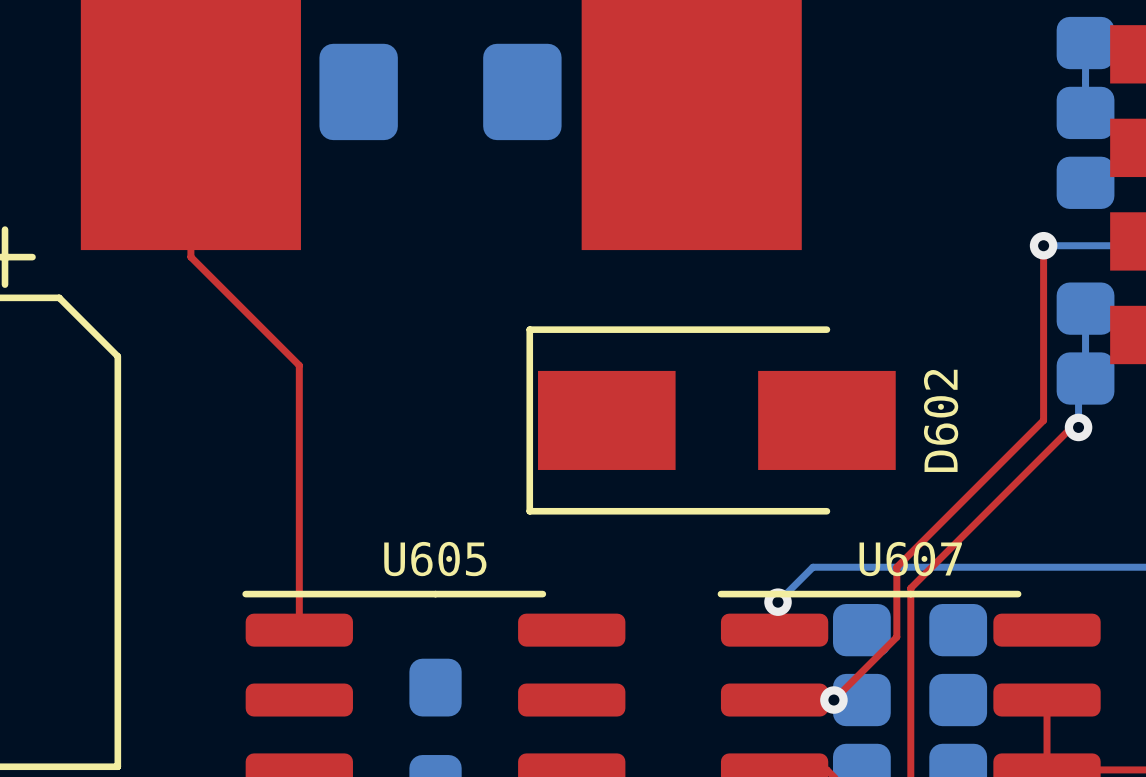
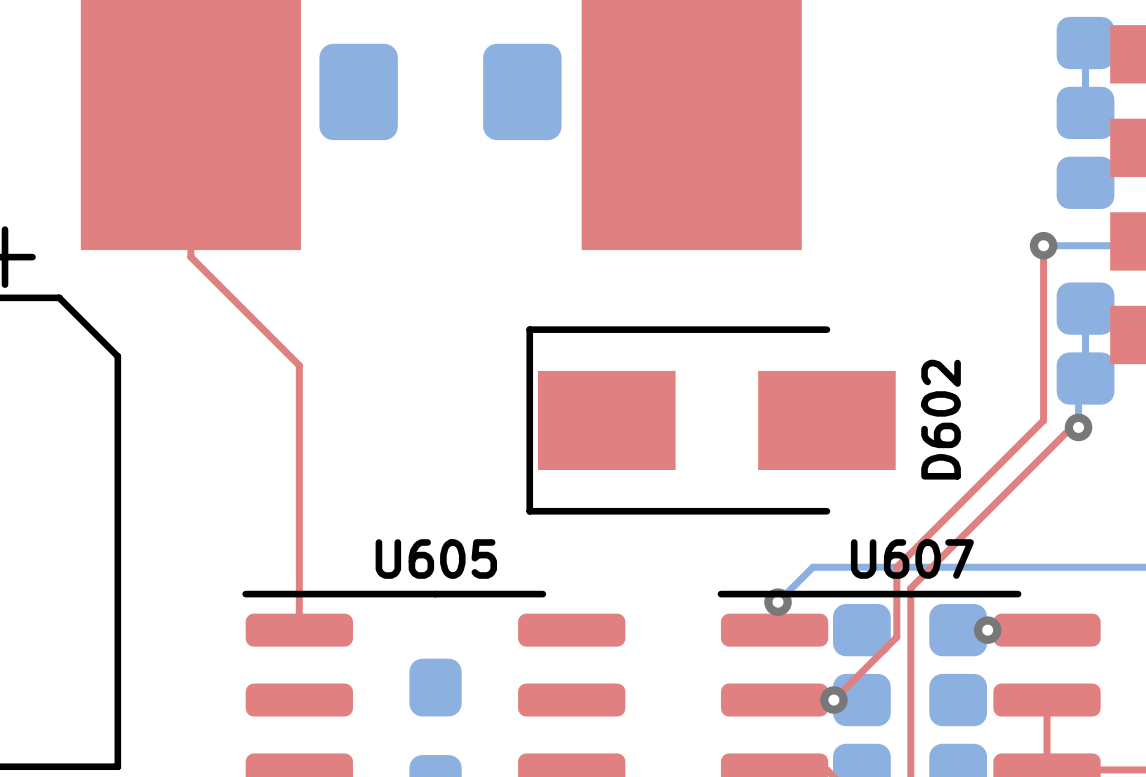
via: none -> (987, 630)

